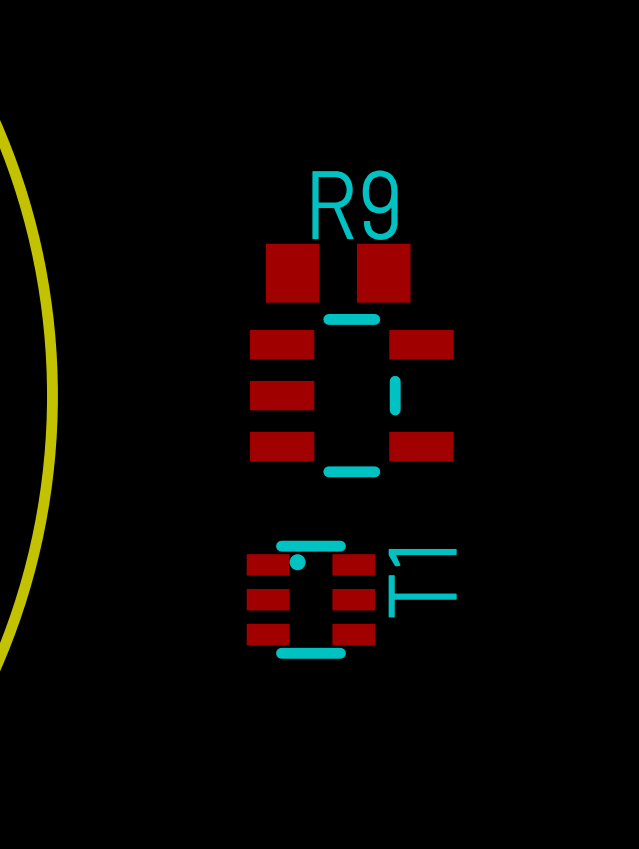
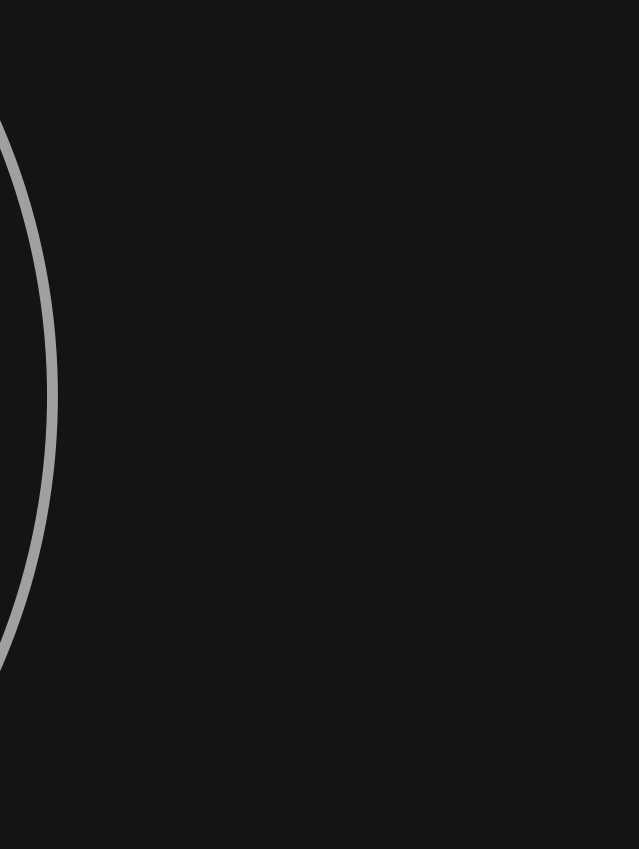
R9: (338, 273) -> none
part: (351, 395) -> none
T1: (310, 599) -> none

